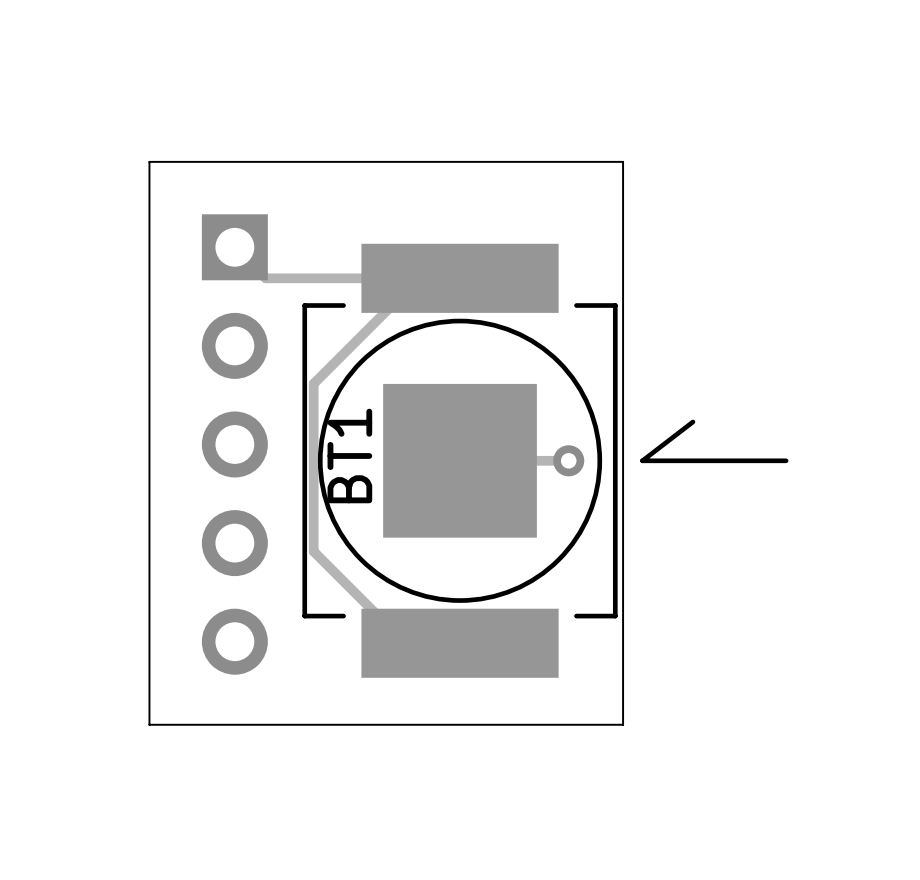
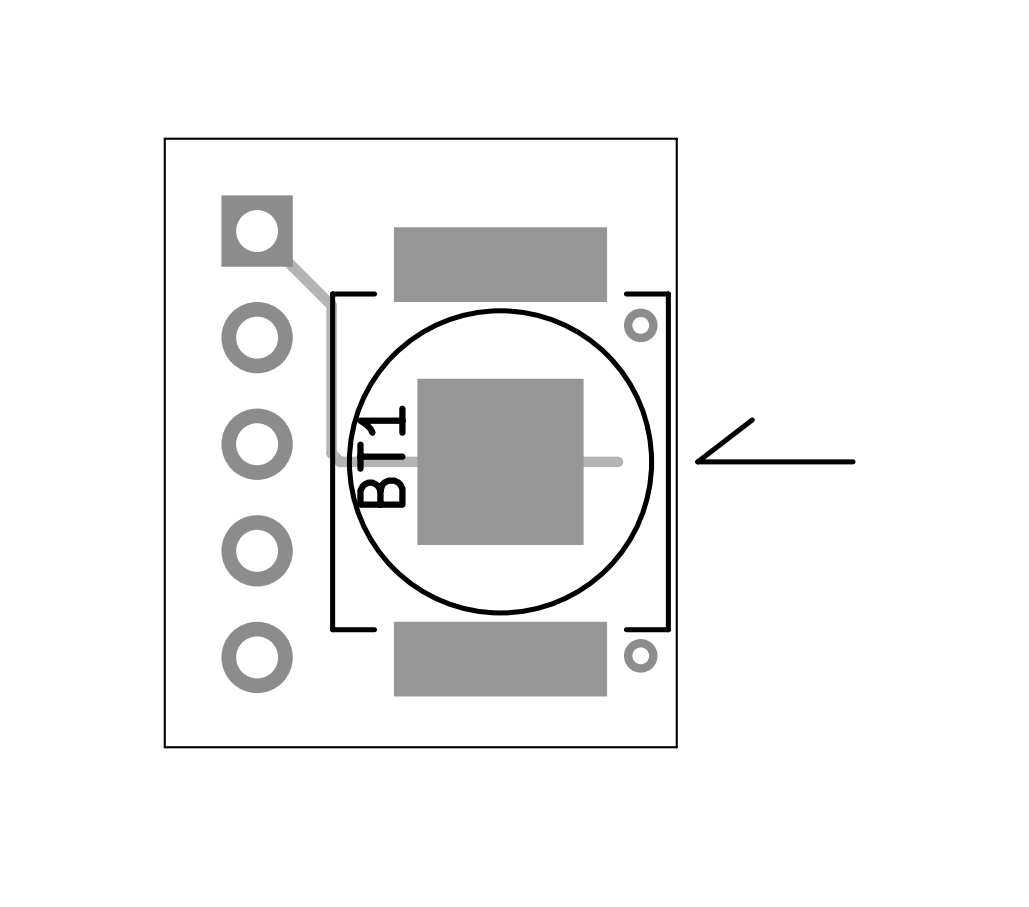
track: (265, 278) (419, 278) (313, 383) (313, 551) (405, 643) -> (290, 264) (331, 305) (331, 453) (340, 461) (500, 461)
via: none -> (640, 325)
via: (568, 460) -> none
via: none -> (640, 655)

